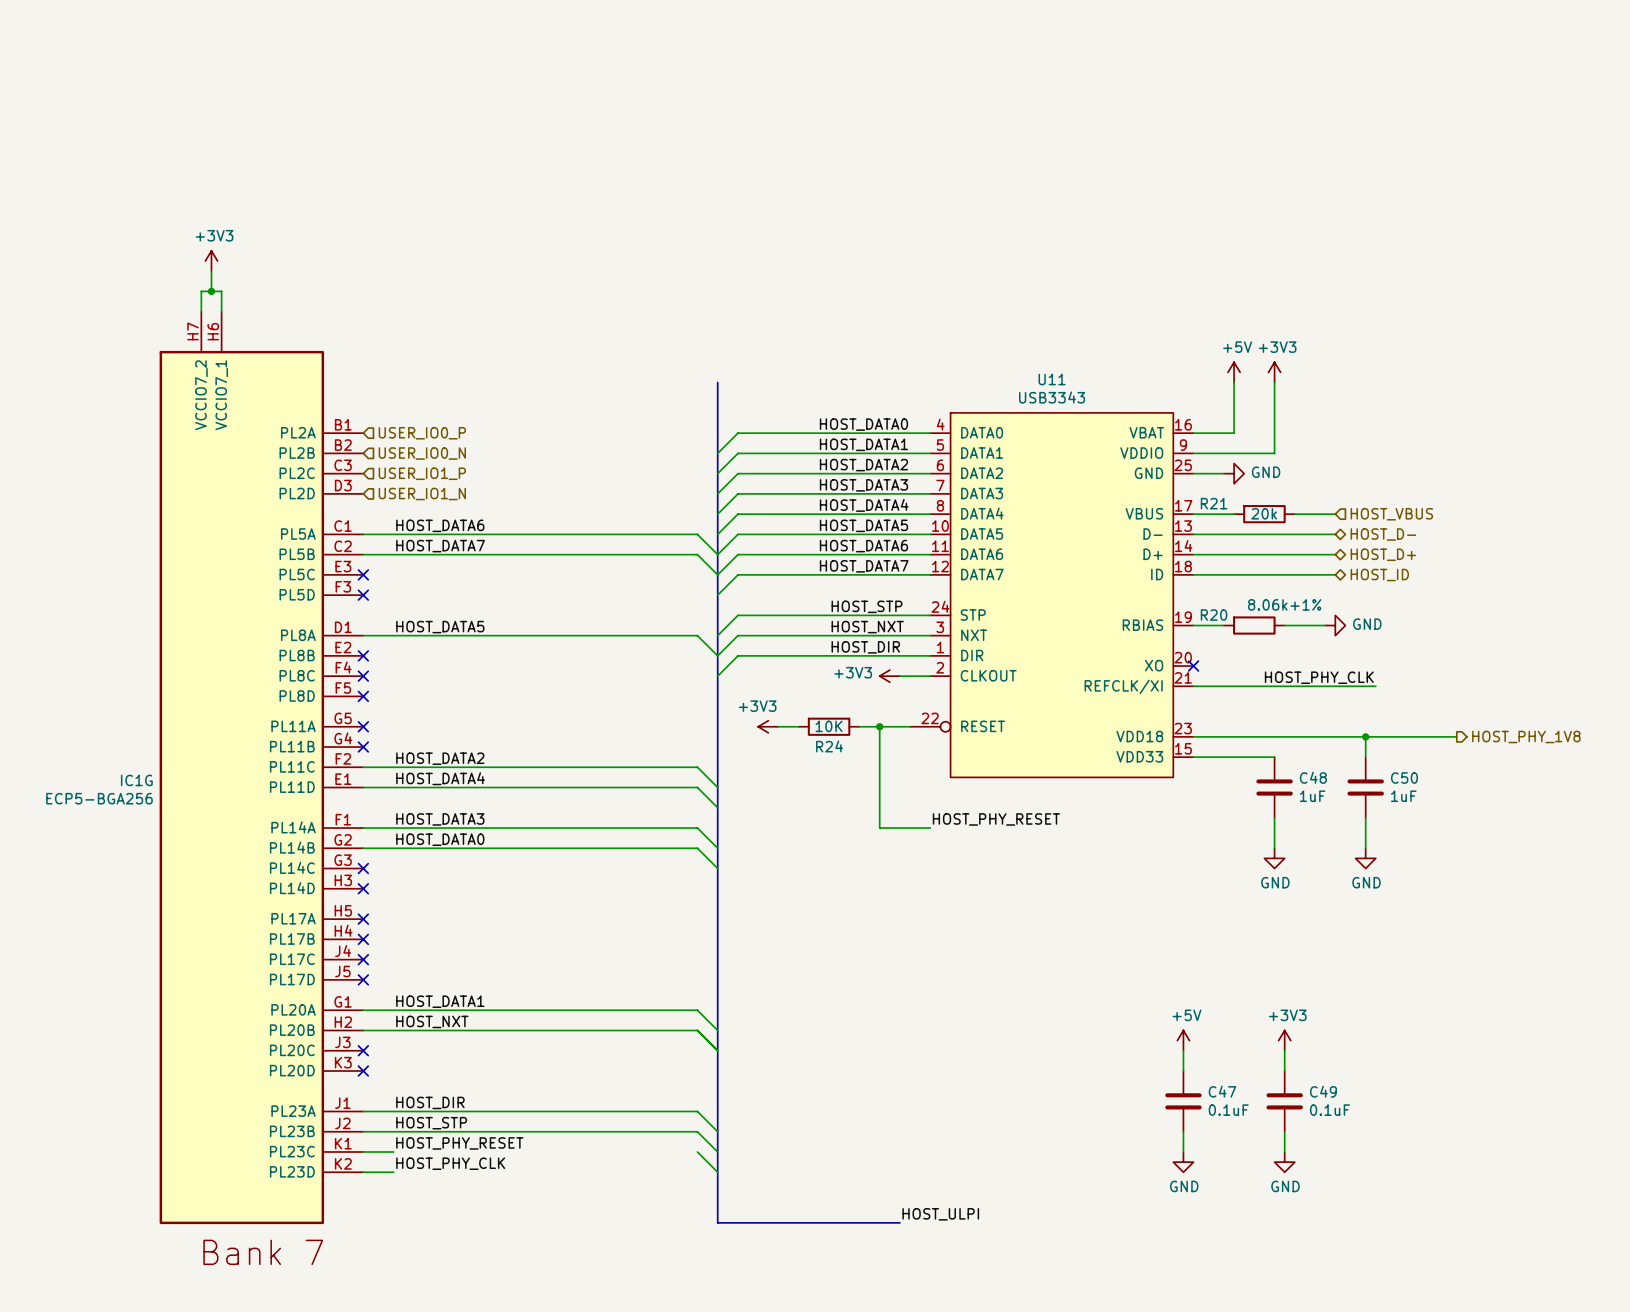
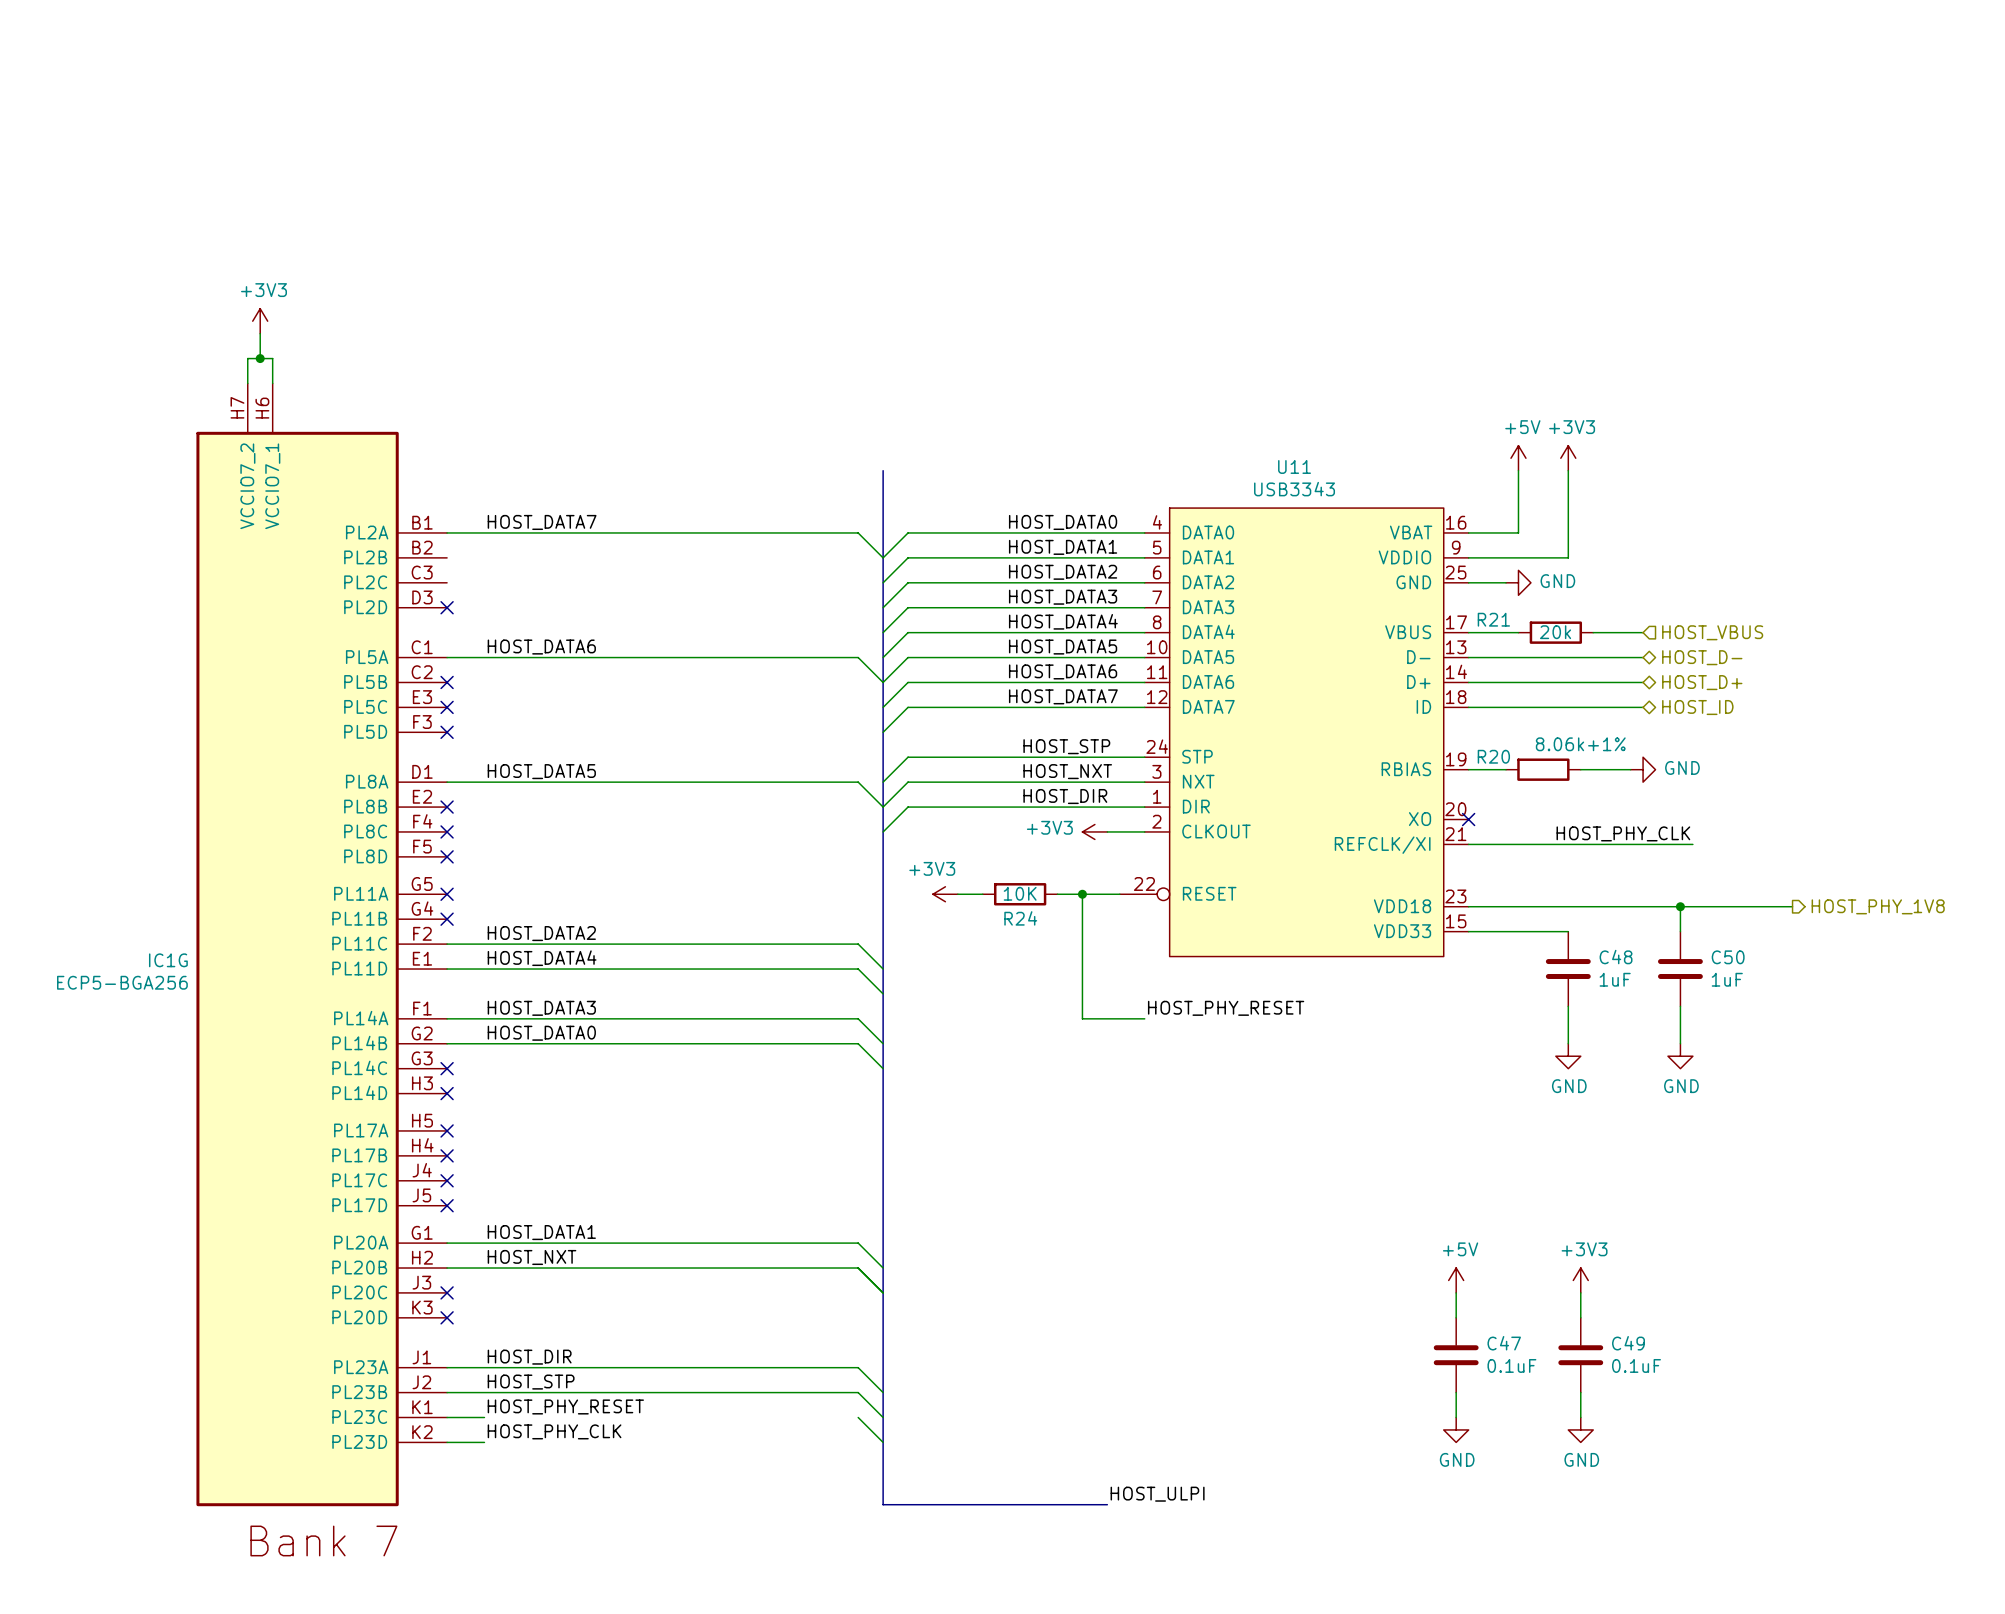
hierarchical label: USER_IO0_P (422, 433) -> none
hierarchical label: USER_IO0_N (422, 453) -> none
hierarchical label: USER_IO1_P (422, 473) -> none
no-connect mark: none -> (447, 607)
hierarchical label: USER_IO1_N (422, 494) -> none
label position: HOST_DATA7 (440, 546) -> HOST_DATA7 (542, 522)
wire: (363, 554) (697, 554) (717, 574) -> (447, 532) (858, 532) (883, 557)
no-connect mark: none -> (447, 682)

